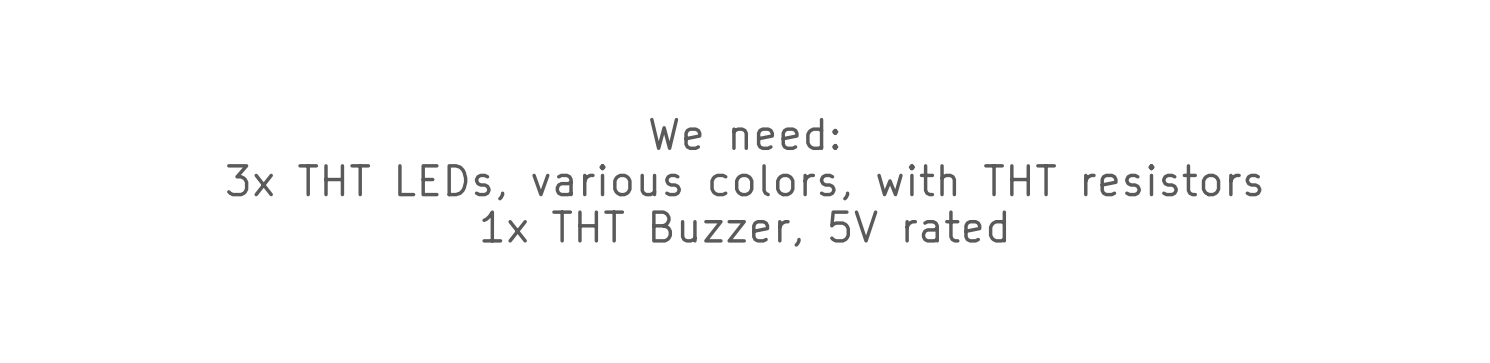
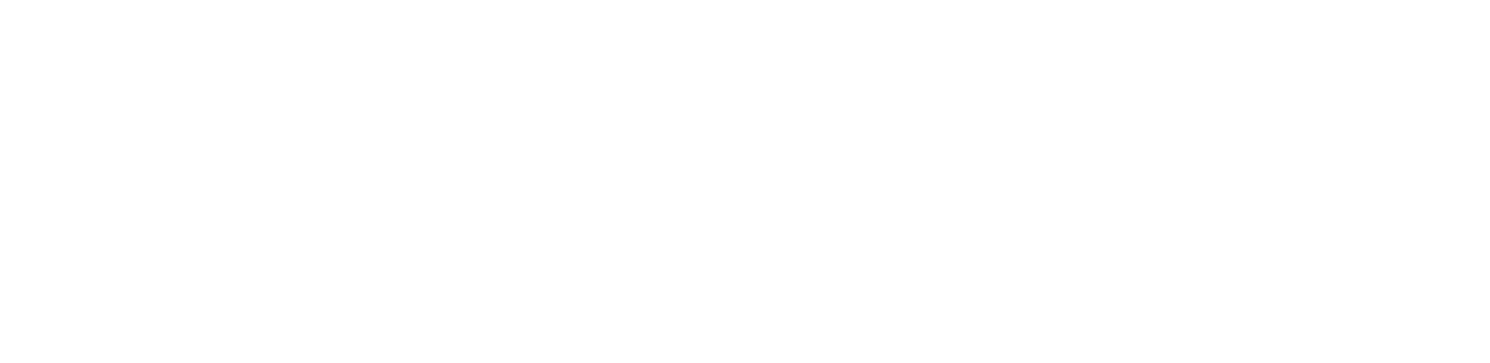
text: We need: (744, 133) -> none
text: 3x THT LEDs, various colors, with THT resistors (744, 182) -> none
text: 1x THT Buzzer, 5V rated (744, 228) -> none

